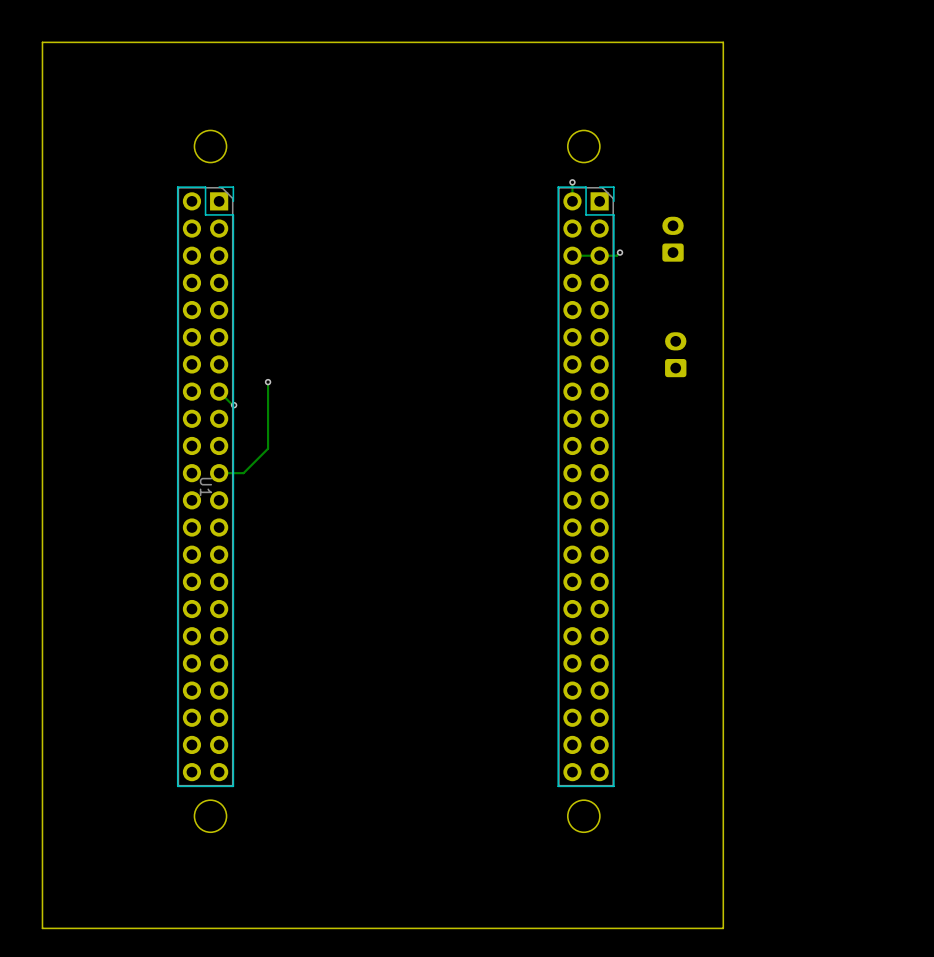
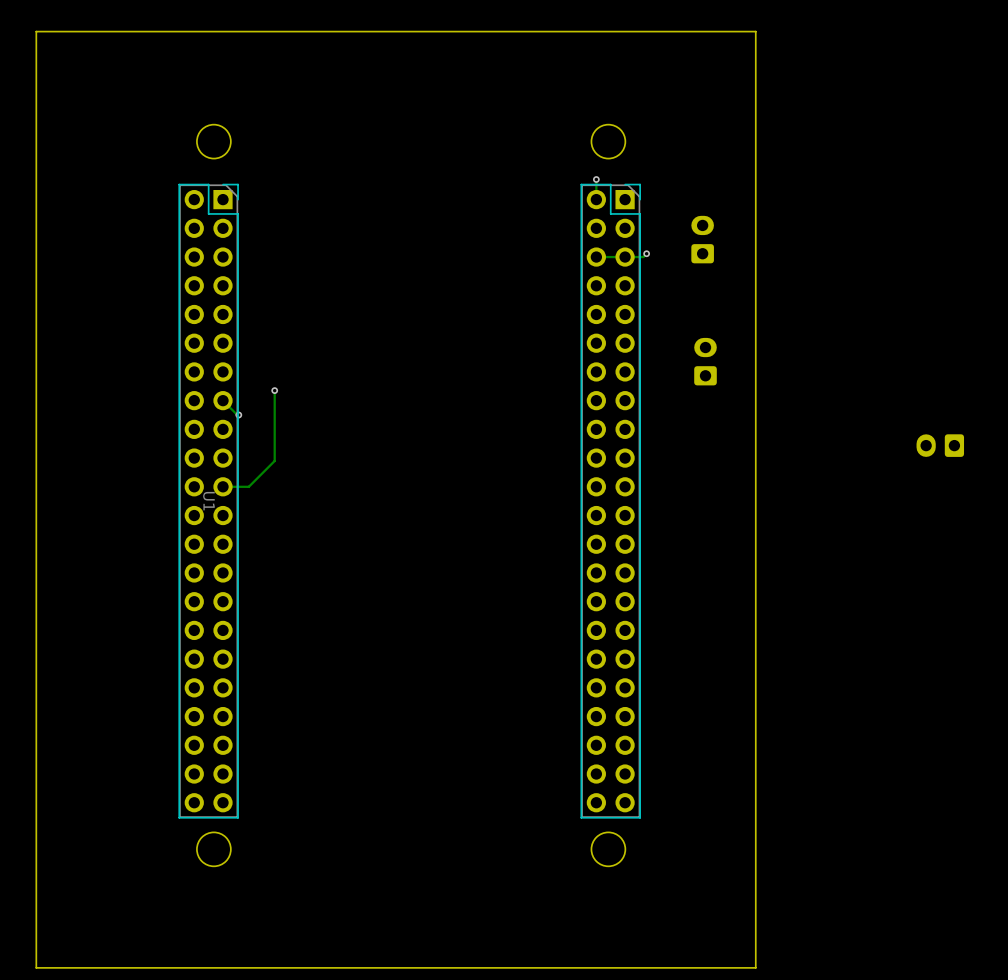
part: none -> (940, 445)

